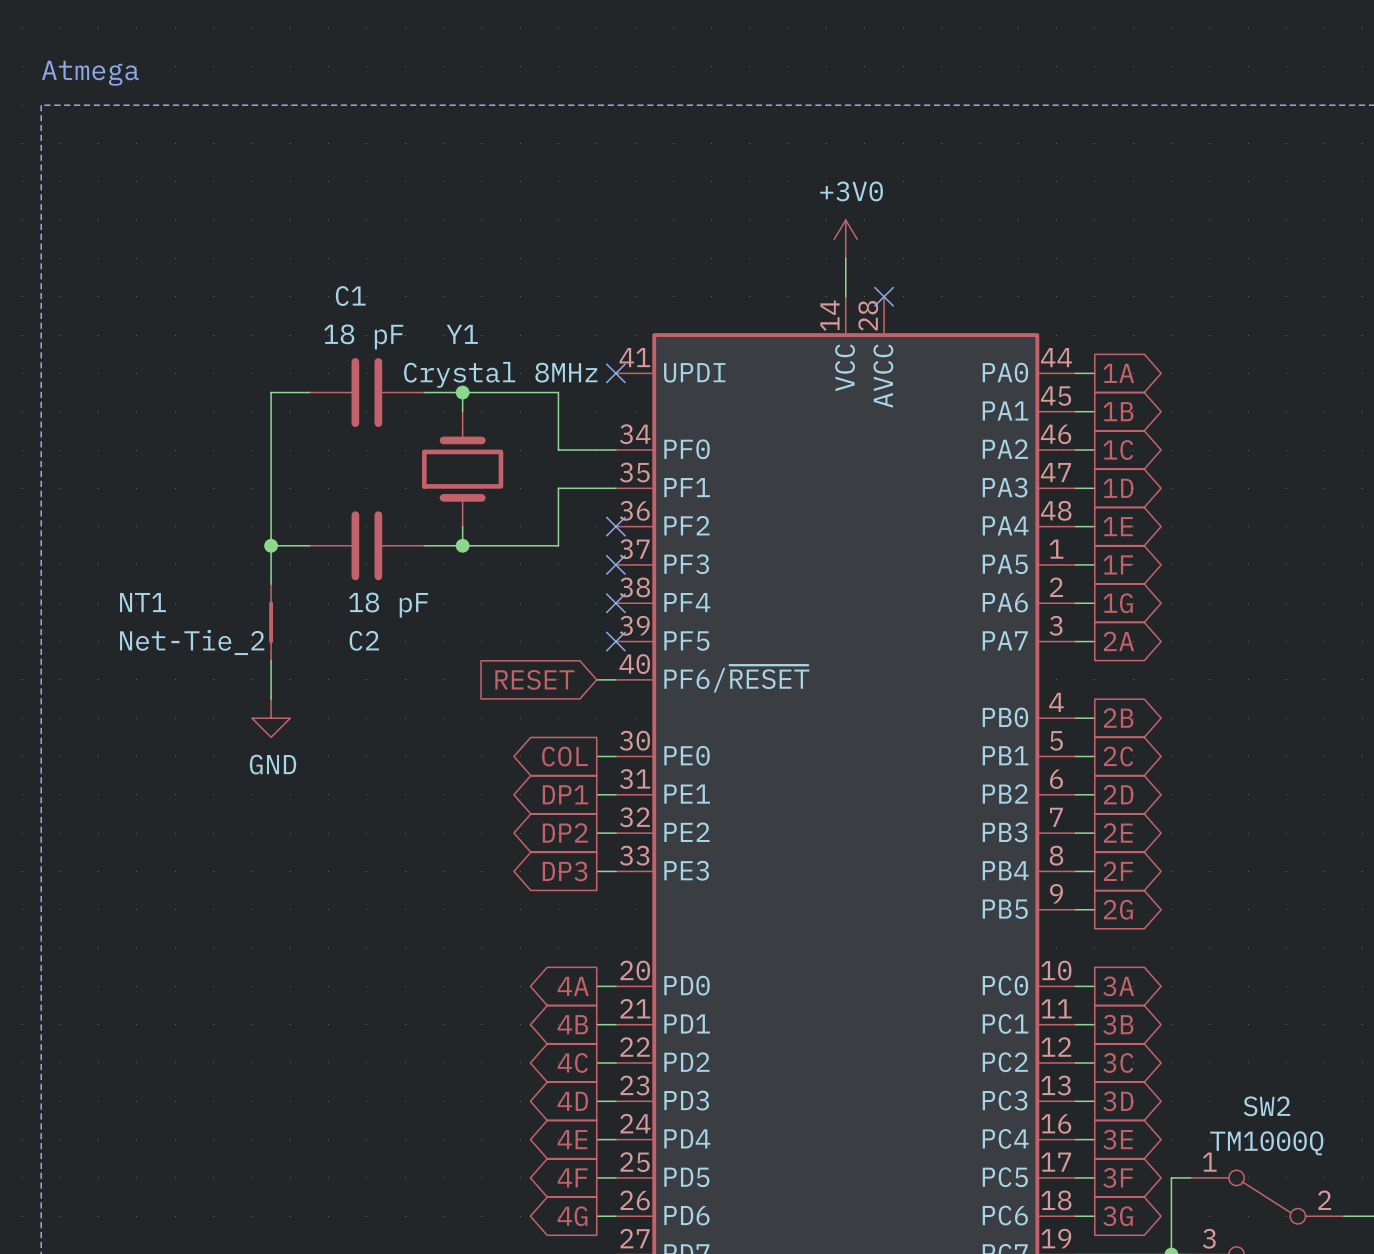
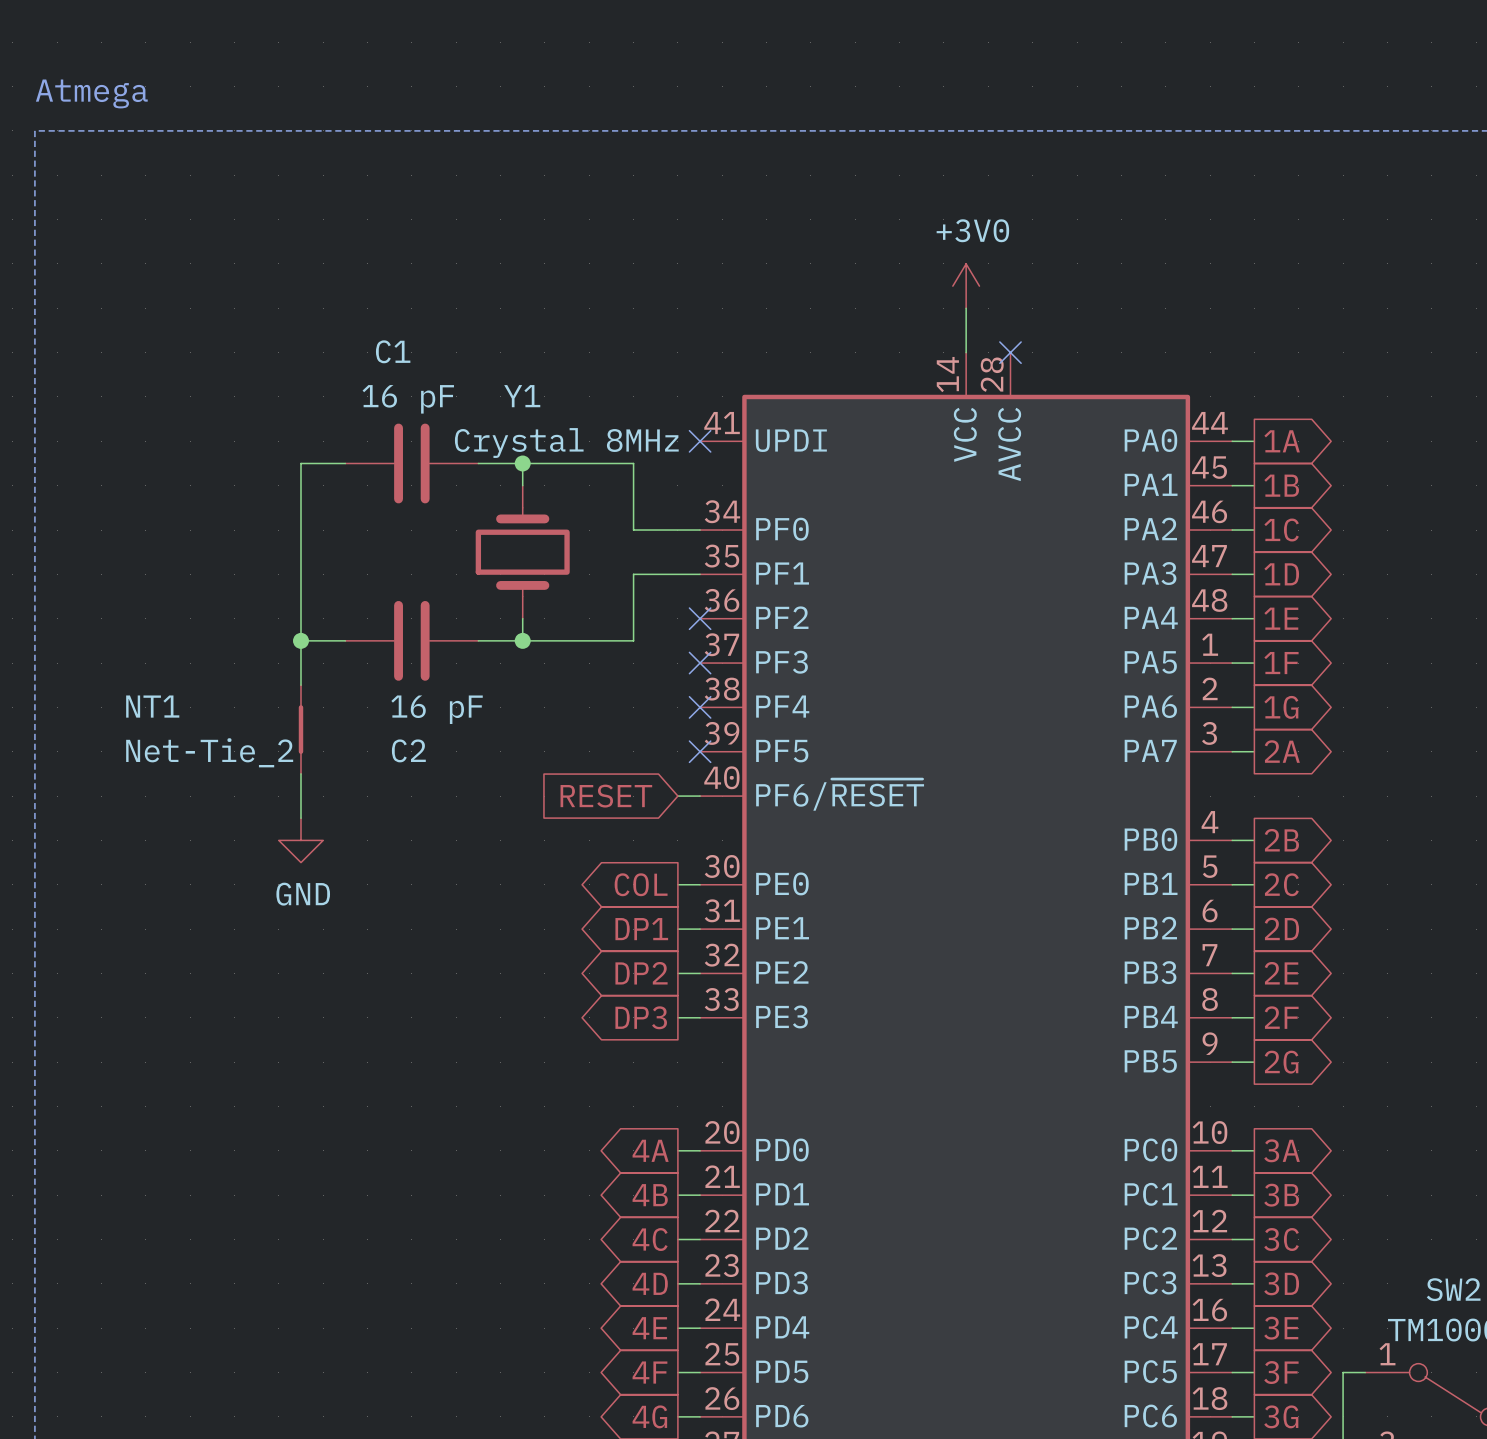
C1 value: 18 pF (363, 336) -> 16 pF (408, 399)
C2 value: 18 pF (388, 605) -> 16 pF (437, 709)

